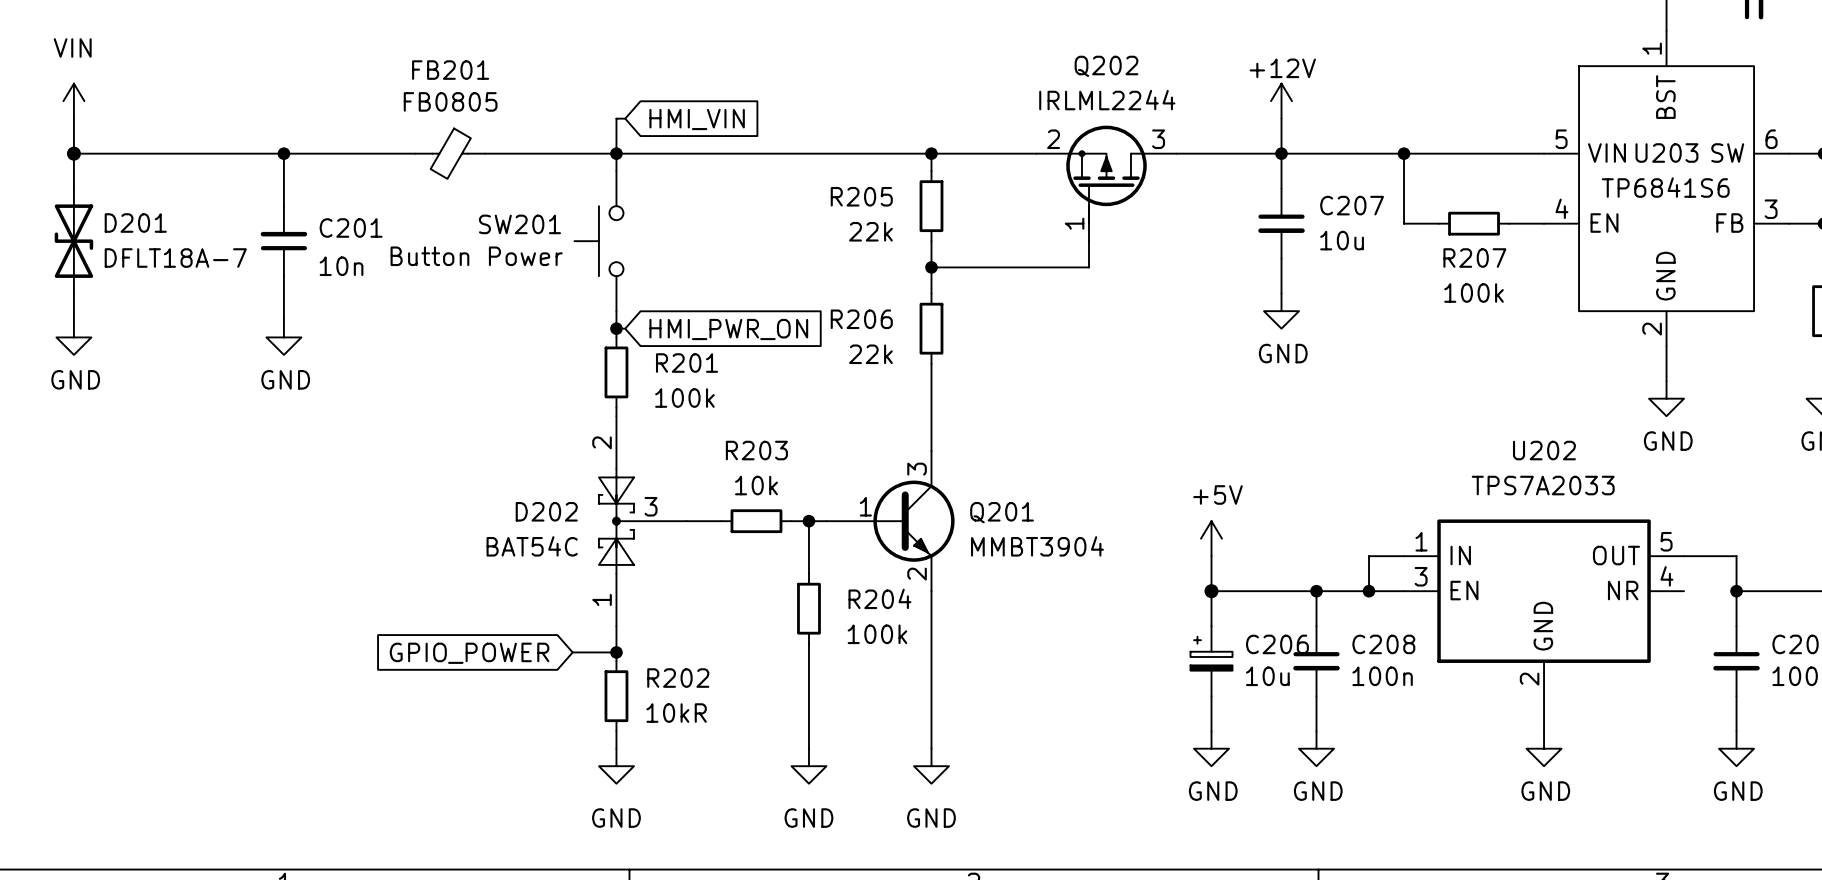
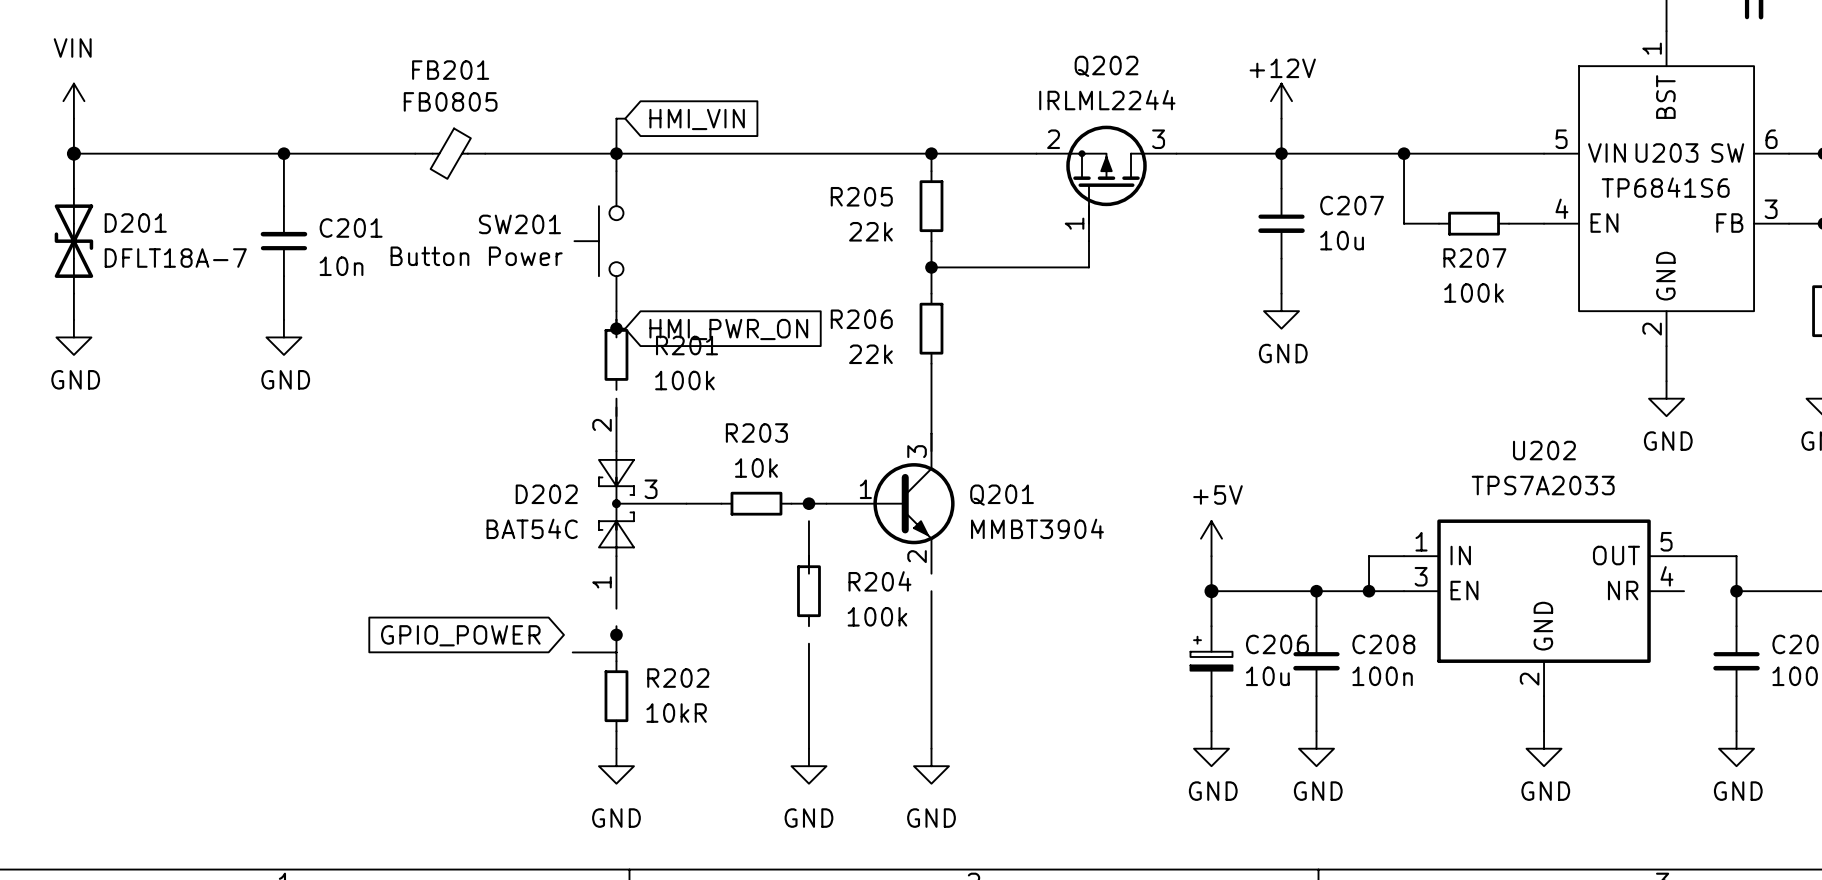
R201 position: (616, 372) -> (616, 354)
D202 position: (642, 521) -> (642, 503)
wire: (686, 521) (721, 521) -> (686, 503) (721, 503)
R203 position: (756, 521) -> (756, 503)
wire: (791, 521) (826, 521) -> (791, 503) (826, 503)
junction position: (808, 521) -> (808, 503)
Q201 position: (890, 521) -> (890, 503)
R204 position: (808, 608) -> (808, 591)
junction position: (616, 652) -> (616, 634)
global label position: GPIO_POWER (469, 653) -> GPIO_POWER (460, 635)

